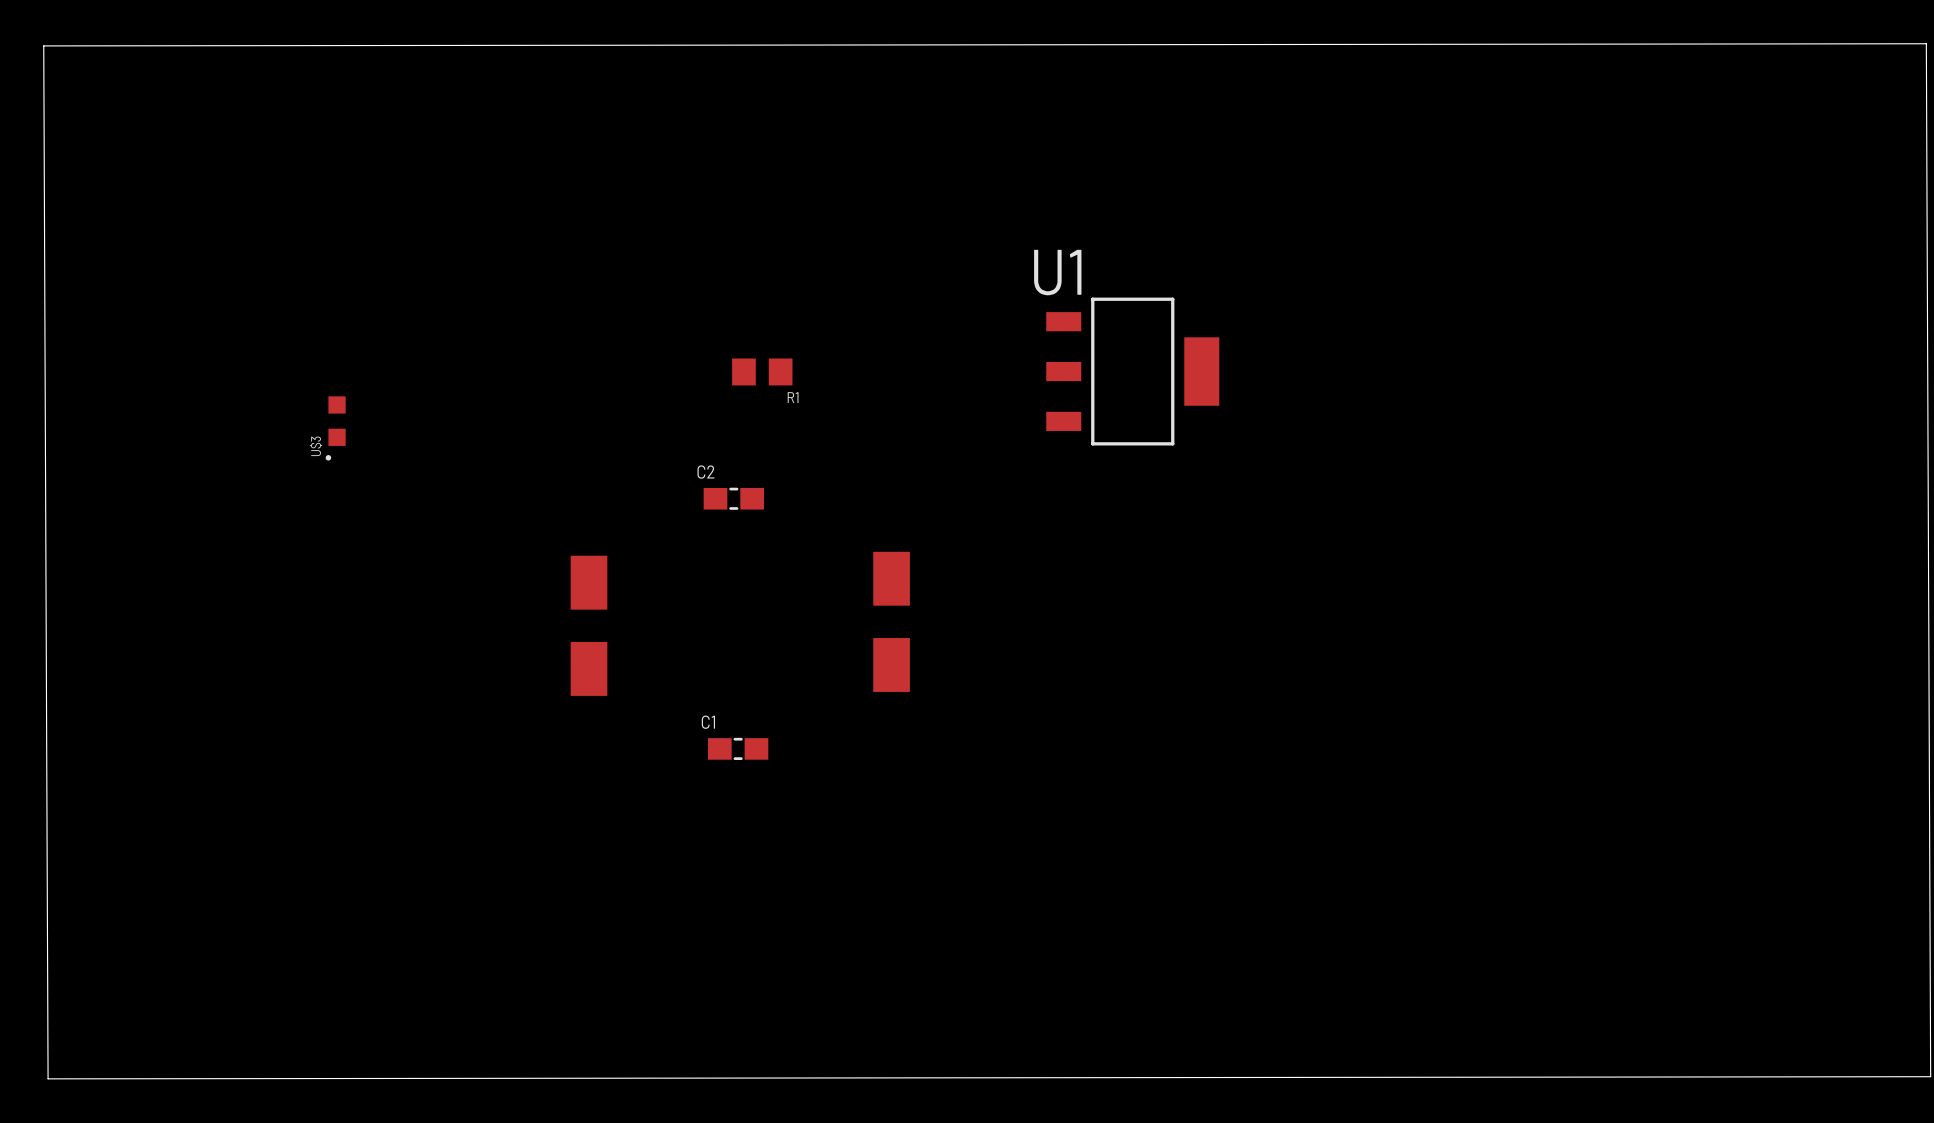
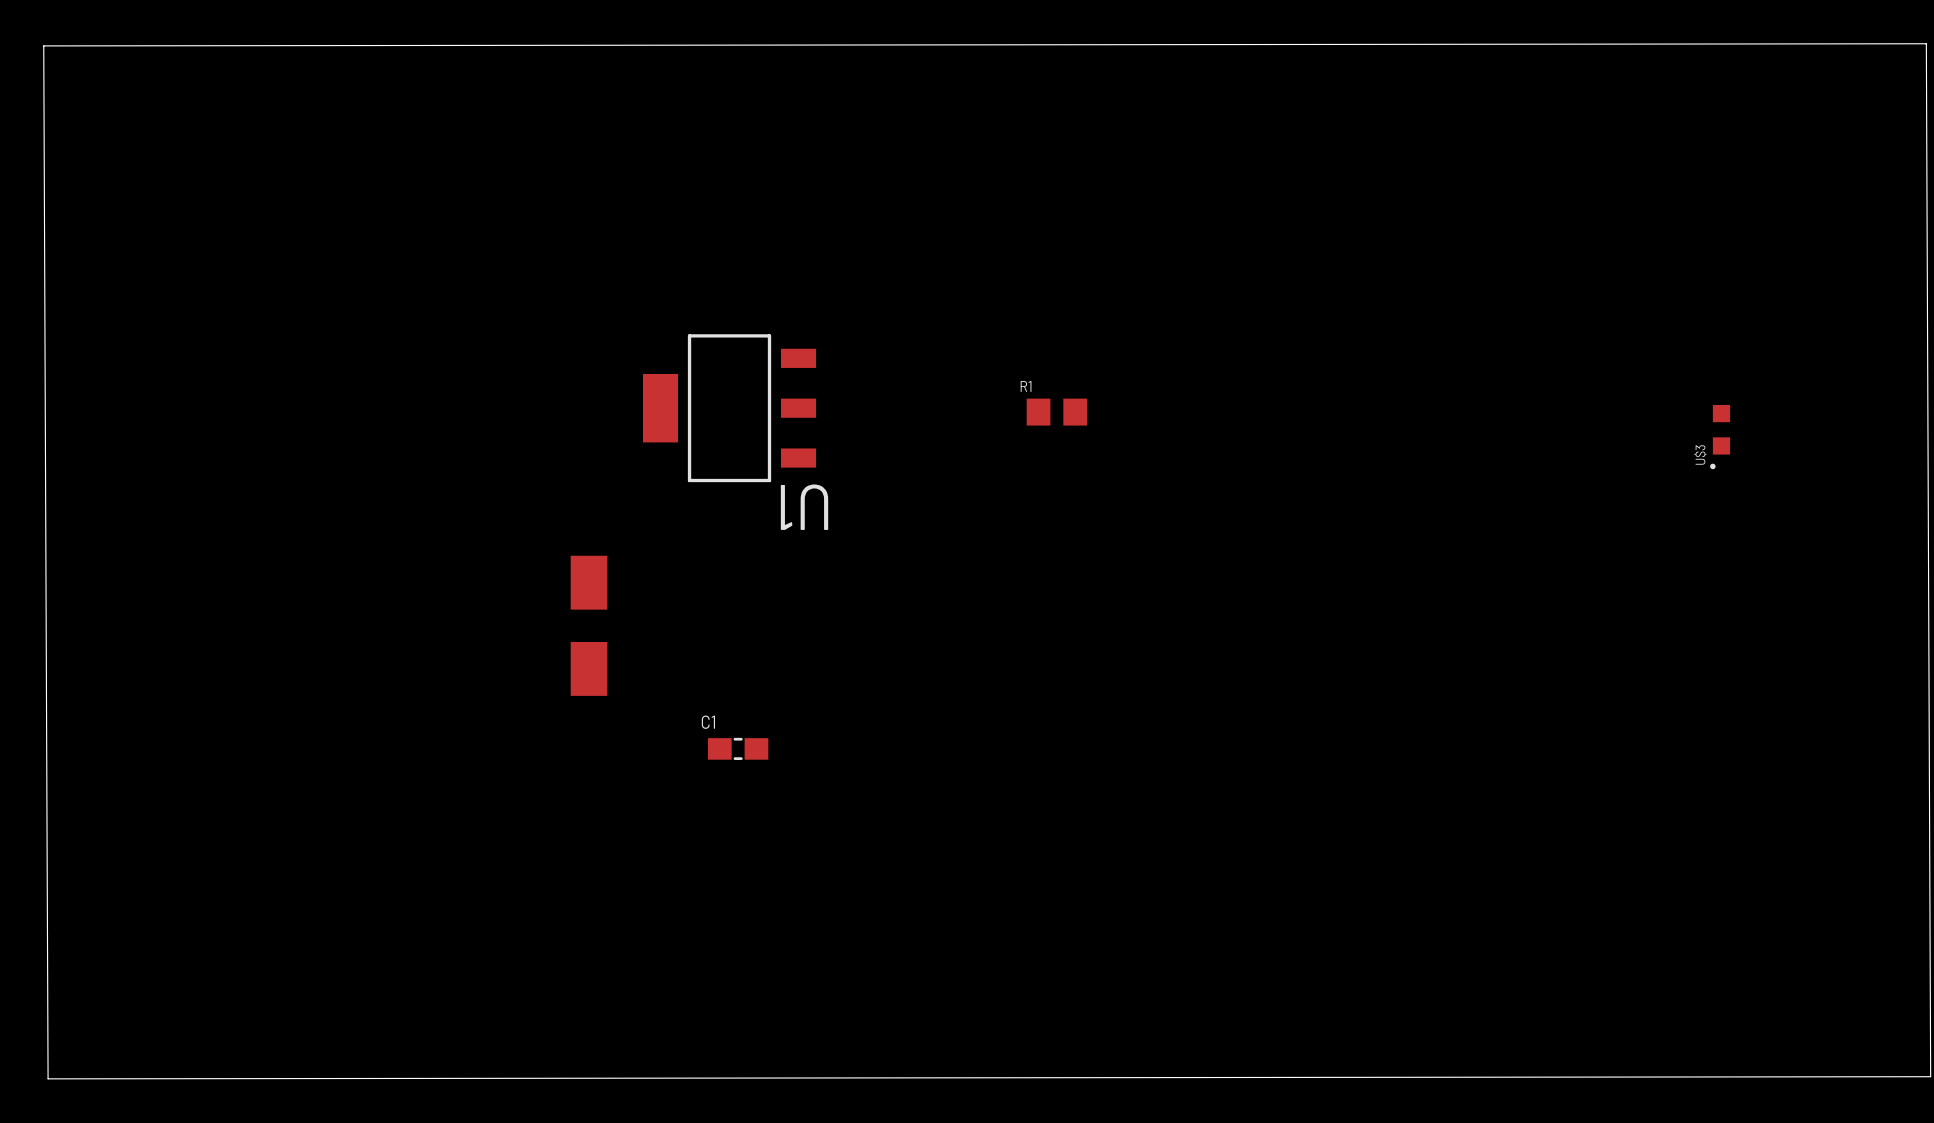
R1 position: (762, 371) -> (1056, 412)
U1 rotation: 0° (1132, 371) -> 180° (729, 408)
U1 position: (1132, 371) -> (729, 408)
R1 name position: R1 (793, 397) -> R1 (1026, 386)
U$3 position: (335, 428) -> (1720, 437)
C2: (733, 498) -> none
part: (891, 621) -> none

